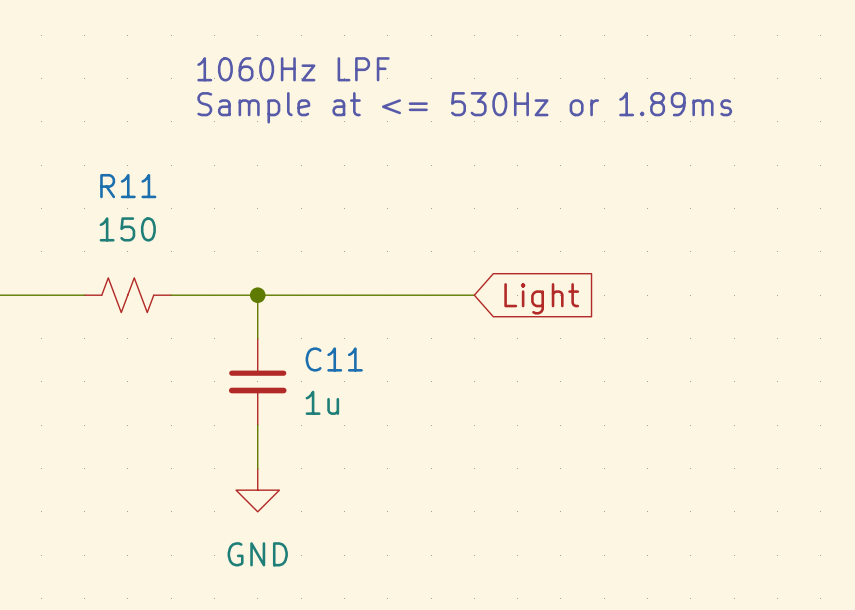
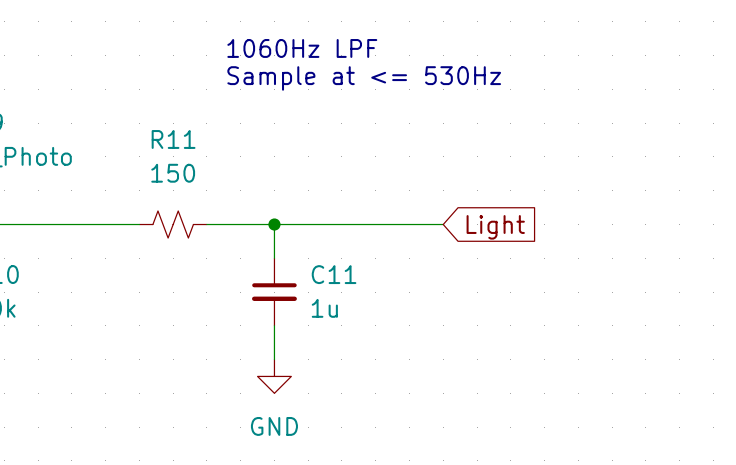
text: Sample at <= 530Hz or 1.89ms (464, 107) -> Sample at <= 530Hz (364, 78)

